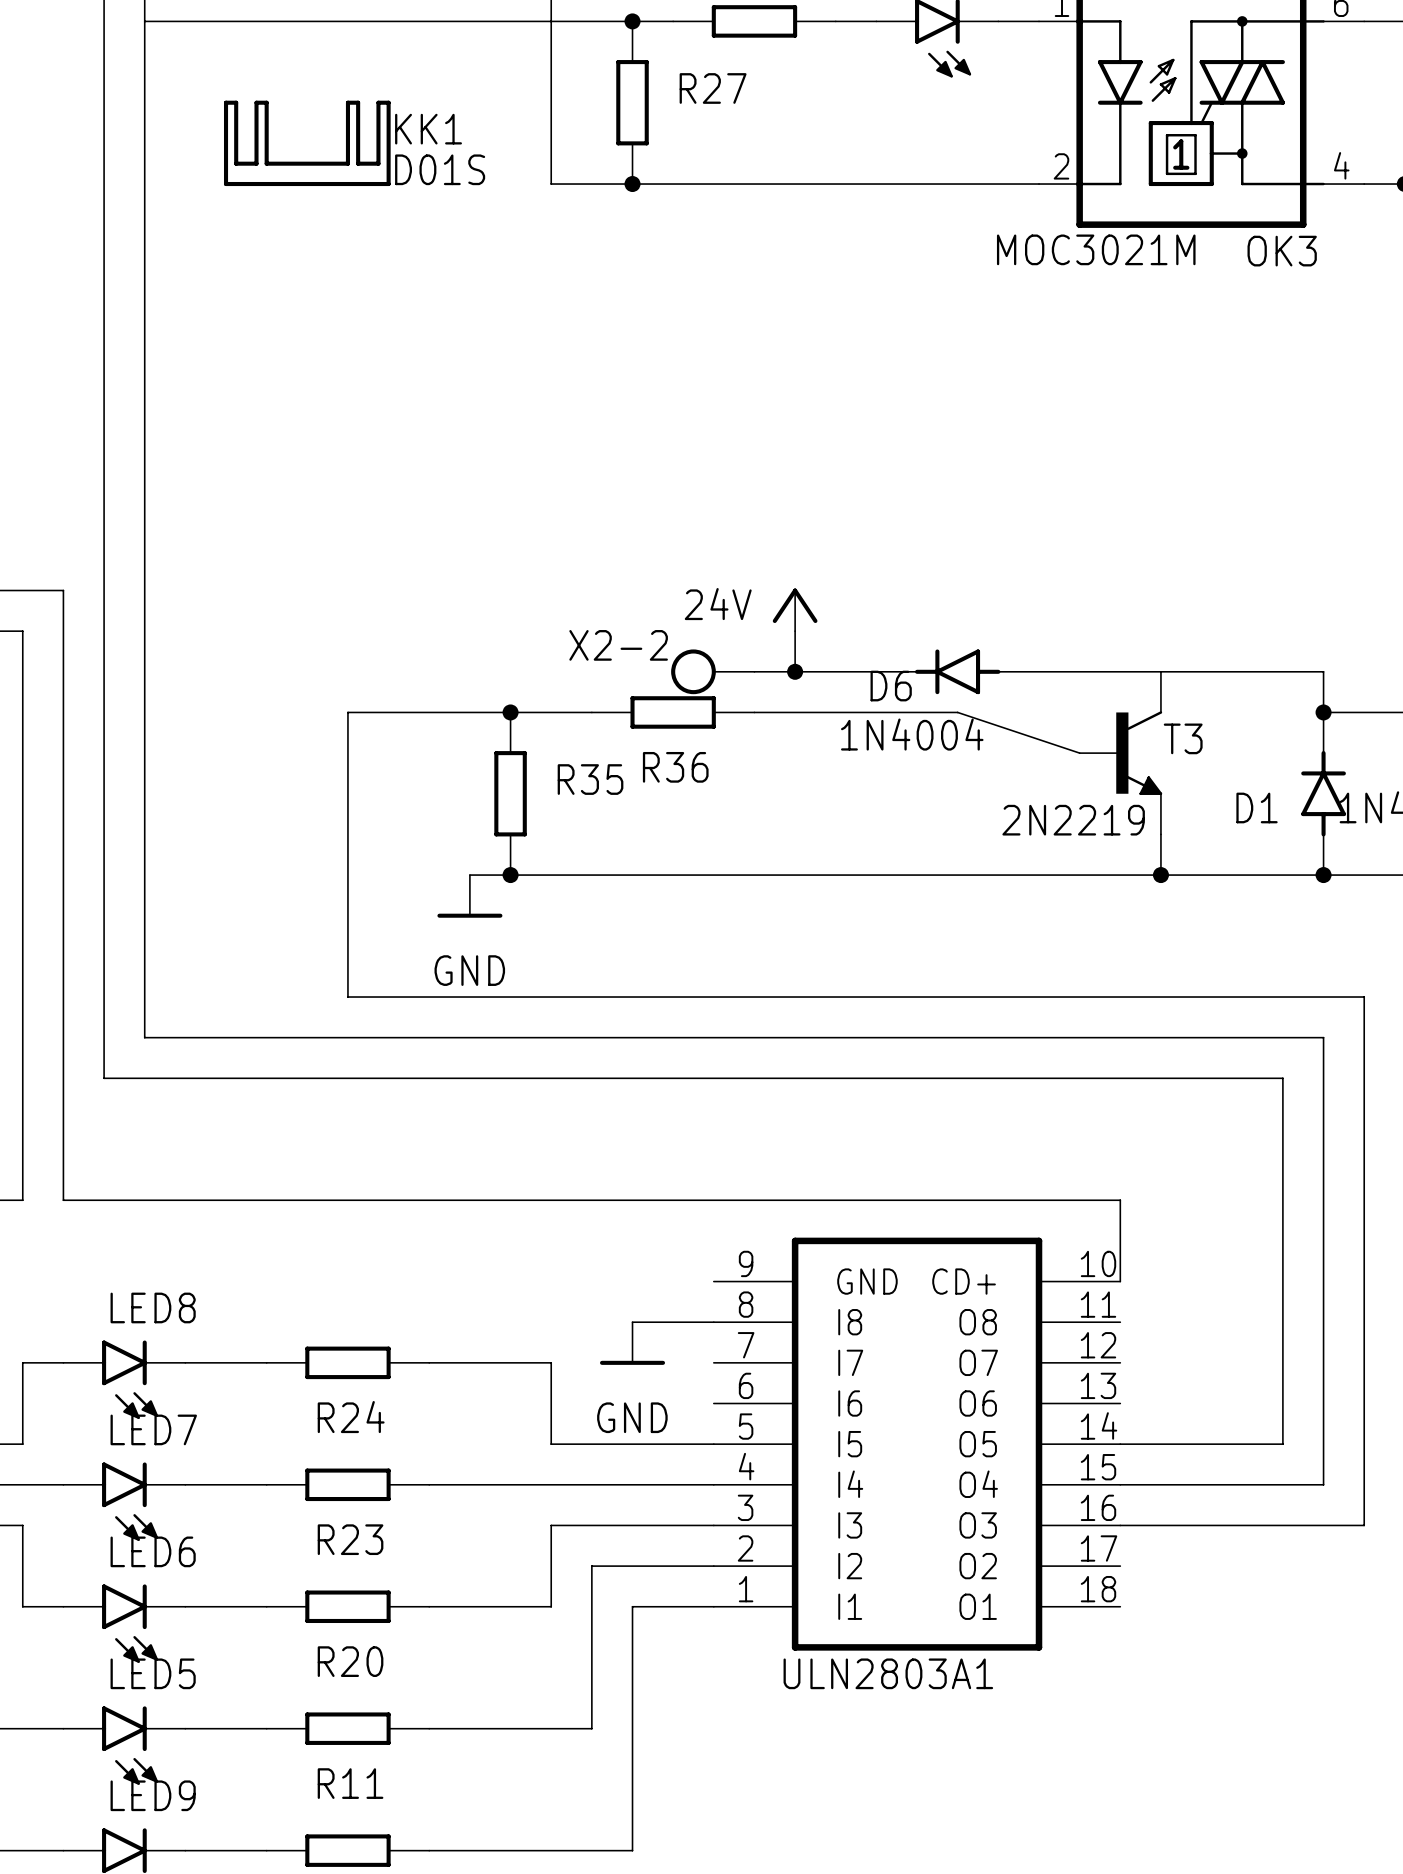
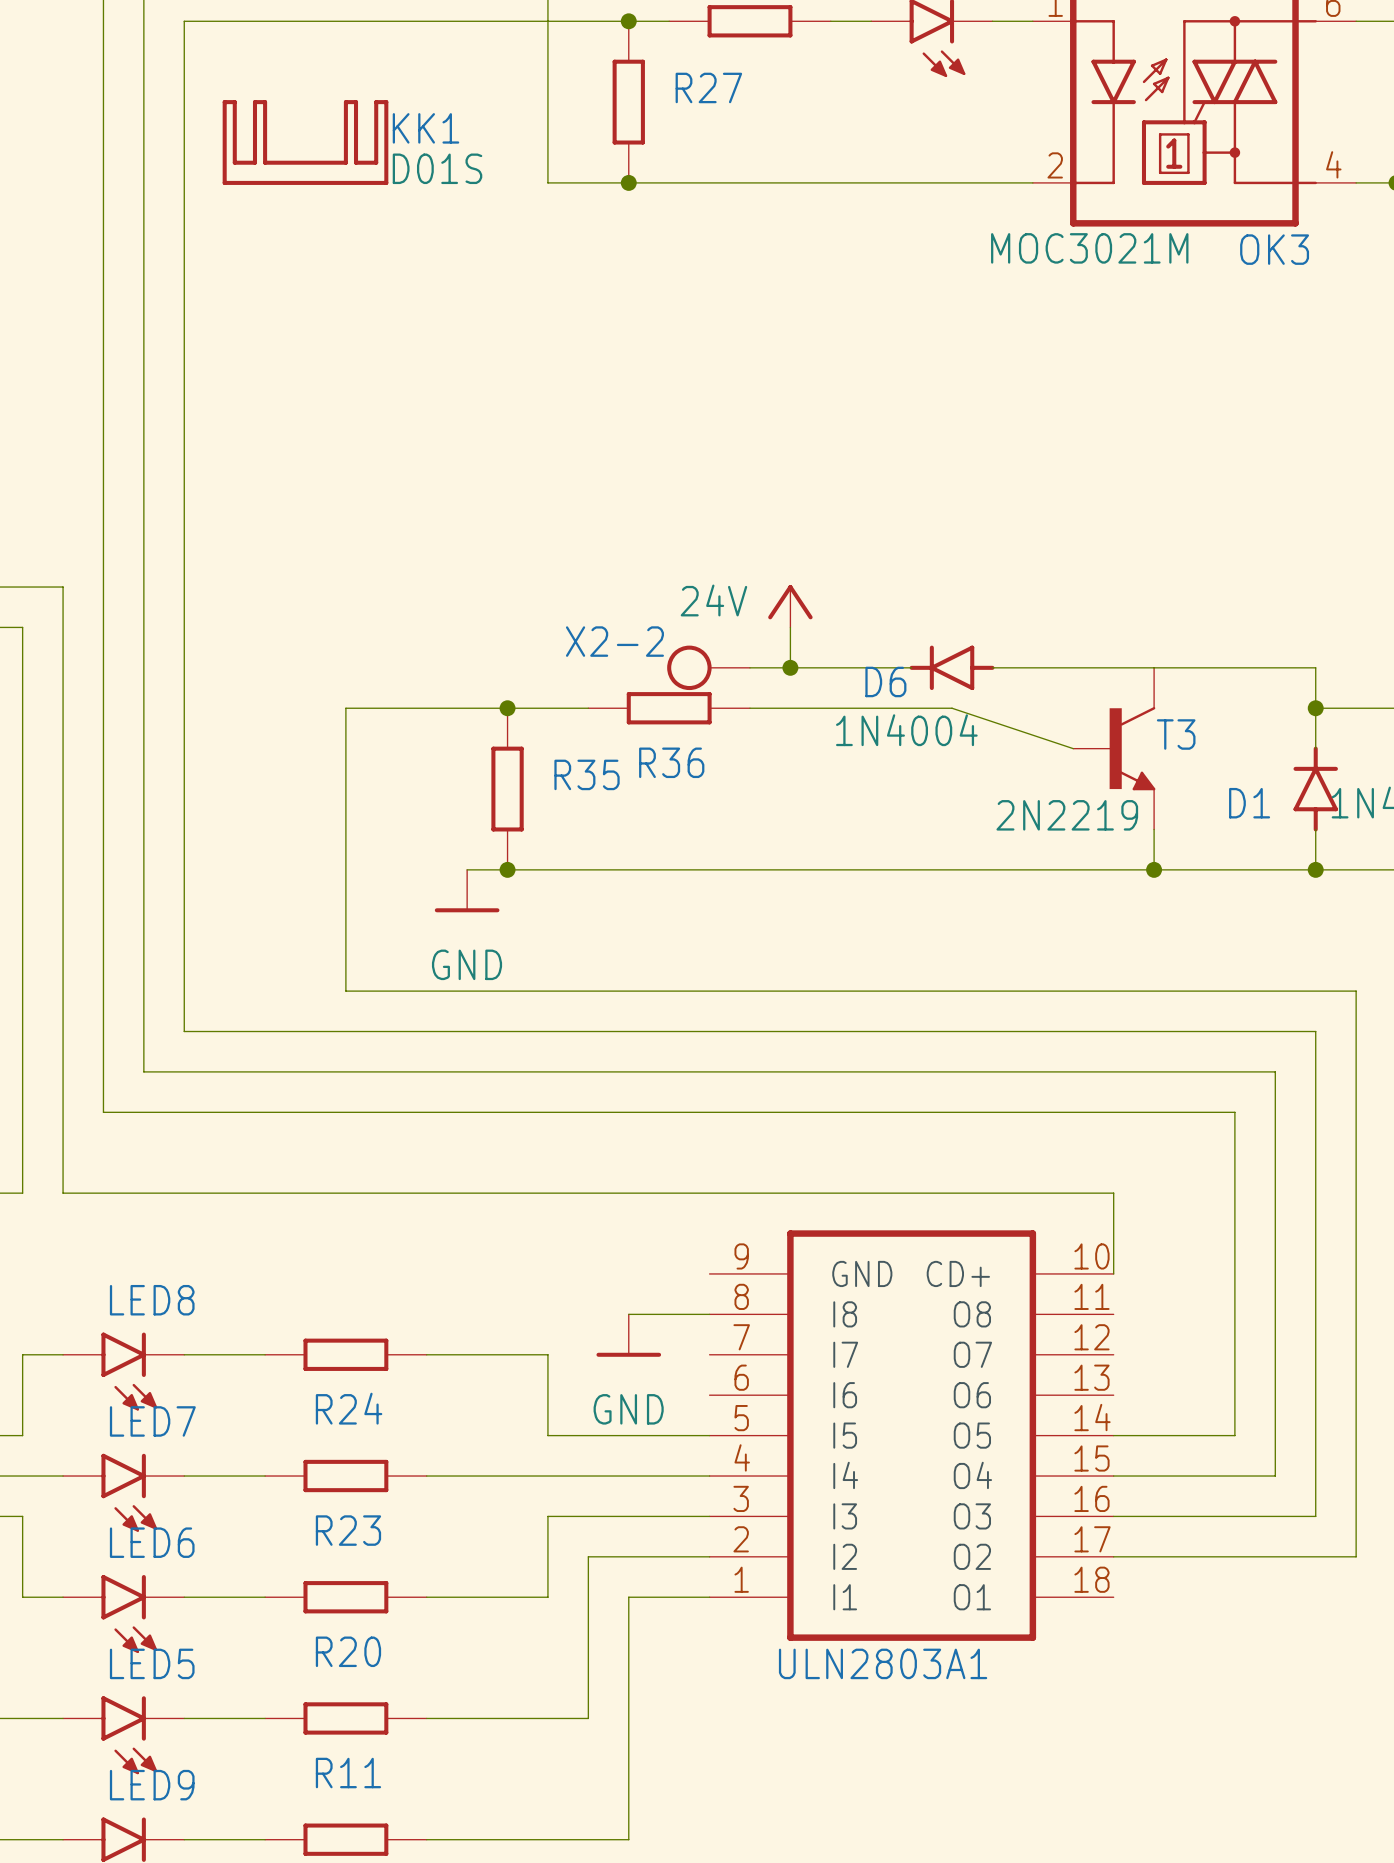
wire: (144, 21) (185, 21) -> (184, 1031) (184, 21)
wire: (144, 1037) (185, 1037) -> none
wire: (104, 1078) (144, 1078) -> (143, 1031) (143, 1071)
wire: (1242, 1444) (1282, 1444) -> (1234, 1435) (1234, 1112) (103, 1112) (103, 1071)
wire: (1282, 1484) (1323, 1484) -> (1275, 1476) (1275, 1435)
wire: (1323, 1525) (1364, 1525) -> (1315, 1516) (1315, 1476)
wire: none -> (1356, 1516) (1356, 1556) (1113, 1556)

